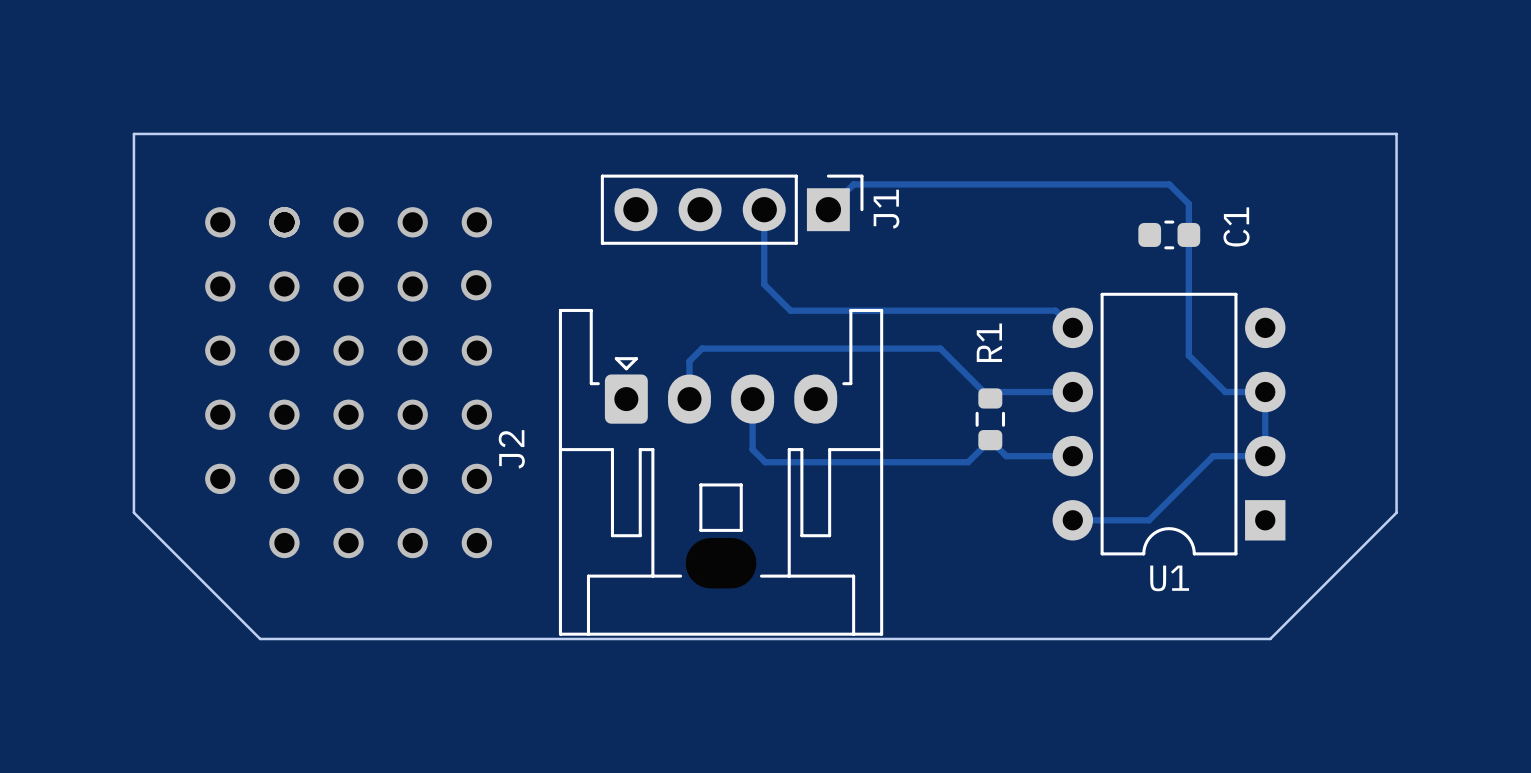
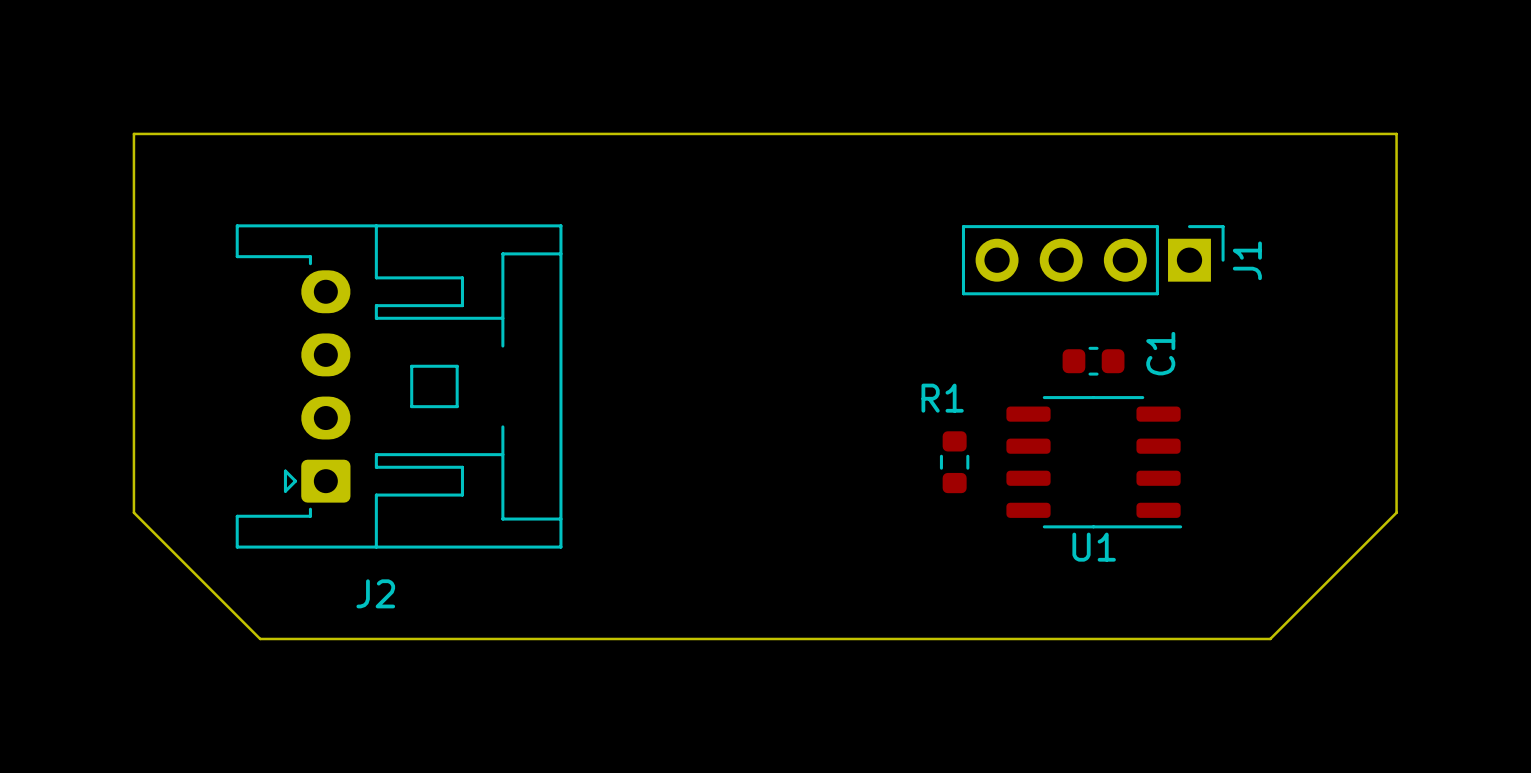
J1 position: (732, 209) -> (1093, 260)
track: (764, 209) (764, 284) (790, 310) (1055, 310) (1072, 327) -> none
track: (828, 209) (853, 184) (1169, 184) (1188, 204) (1188, 355) (1225, 392) (1265, 392) (1265, 456) (1213, 456) (1149, 520) (1072, 520) -> none
via: (220, 222) -> none
via: (284, 222) -> none
via: (348, 222) -> none
via: (412, 222) -> none
via: (476, 222) -> none
C1 position: (1169, 234) -> (1093, 361)
via: (476, 285) -> none
via: (220, 286) -> none
via: (284, 286) -> none
via: (348, 286) -> none
via: (412, 286) -> none
U1 footprint: [1052, 292, 1286, 556] -> [1006, 396, 1183, 529]
R1 name rotation: 0° (989, 342) -> 90° clockwise (942, 398)
via: (220, 350) -> none
via: (284, 350) -> none
via: (348, 350) -> none
via: (412, 350) -> none
via: (476, 350) -> none
track: (1072, 392) (996, 392) (990, 398) (940, 348) (702, 348) (689, 361) (689, 399) -> none
track: (752, 399) (752, 449) (765, 462) (968, 462) (990, 440) (1006, 456) (1072, 456) -> none
via: (220, 414) -> none
via: (284, 414) -> none
via: (348, 414) -> none
via: (412, 414) -> none
via: (476, 414) -> none
R1 position: (990, 419) -> (954, 462)
J2 rotation: 0° (721, 472) -> 90° counterclockwise (399, 386)
J2 position: (721, 472) -> (399, 386)
via: (220, 478) -> none
via: (284, 478) -> none
via: (348, 478) -> none
via: (412, 478) -> none
via: (476, 478) -> none
via: (284, 543) -> none
via: (348, 543) -> none
via: (412, 543) -> none
via: (476, 543) -> none
U1 name position: U1 (1169, 578) -> U1 (1094, 547)

